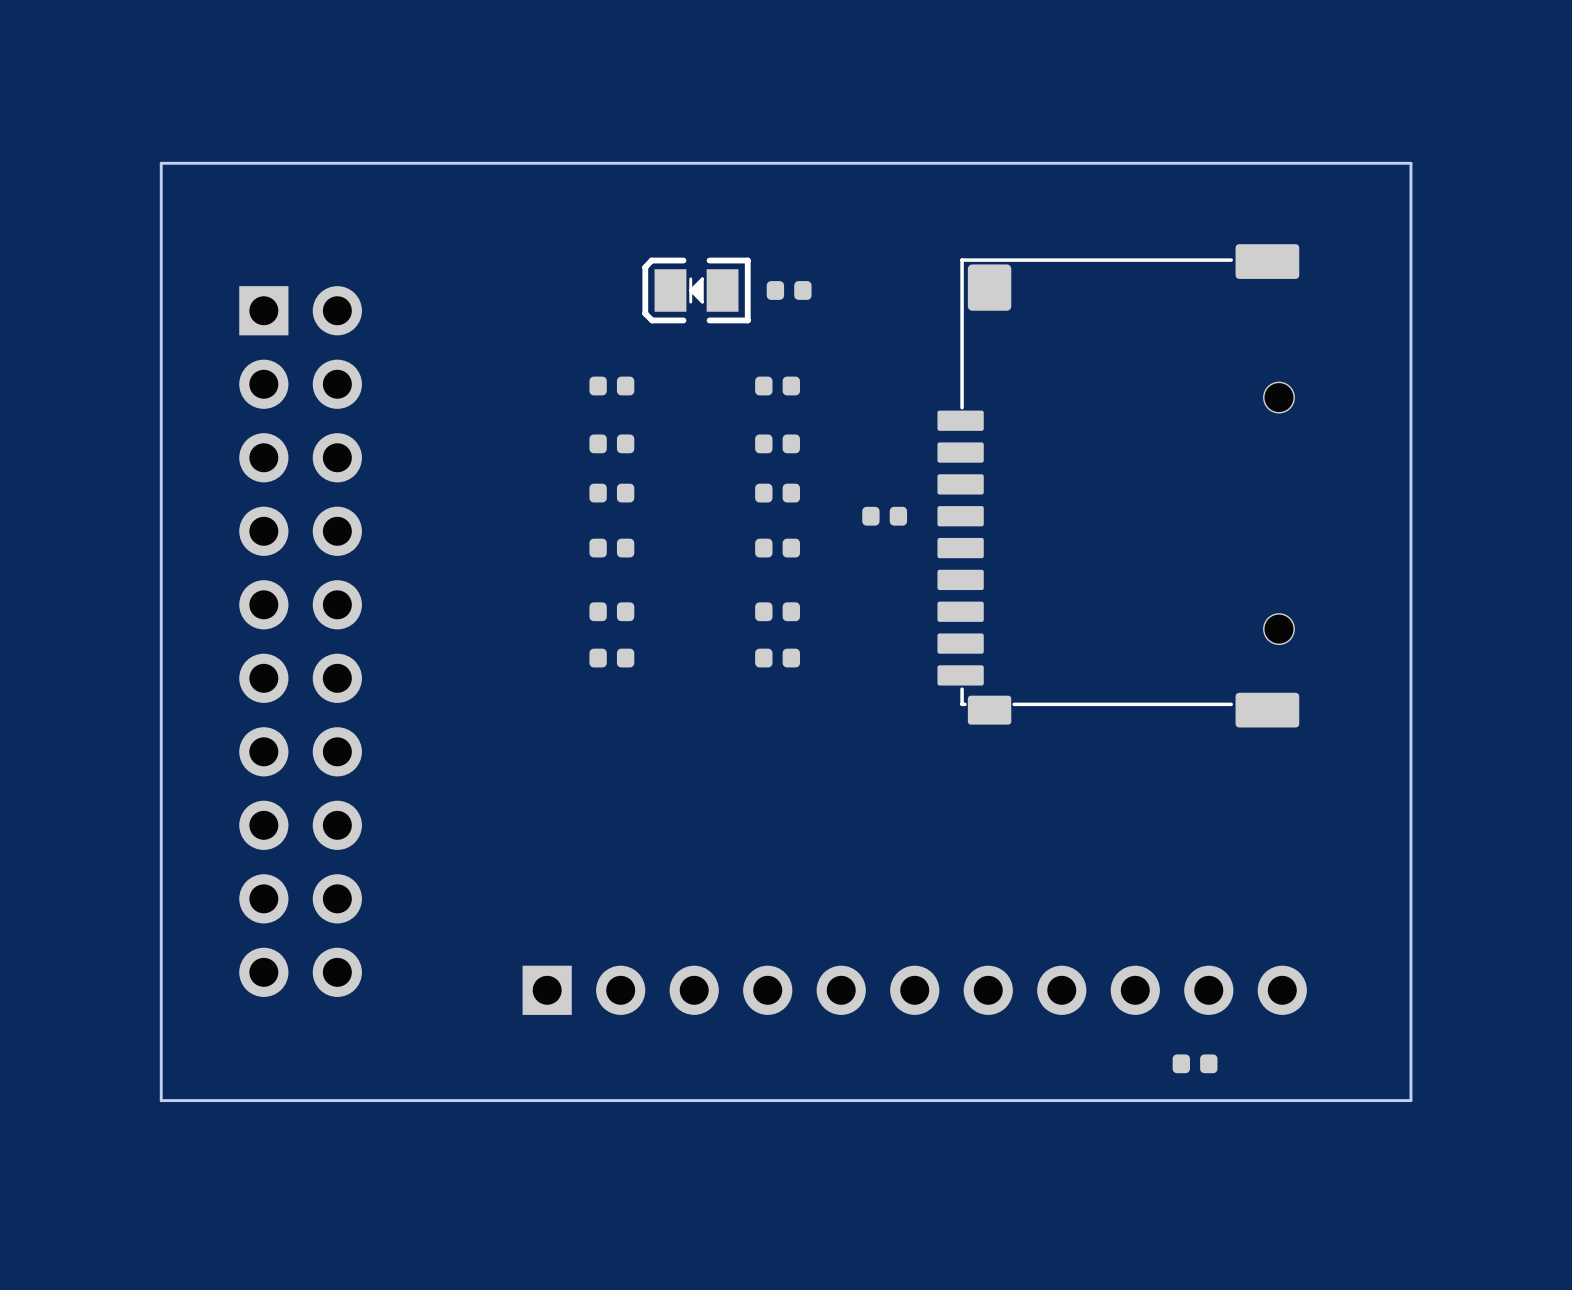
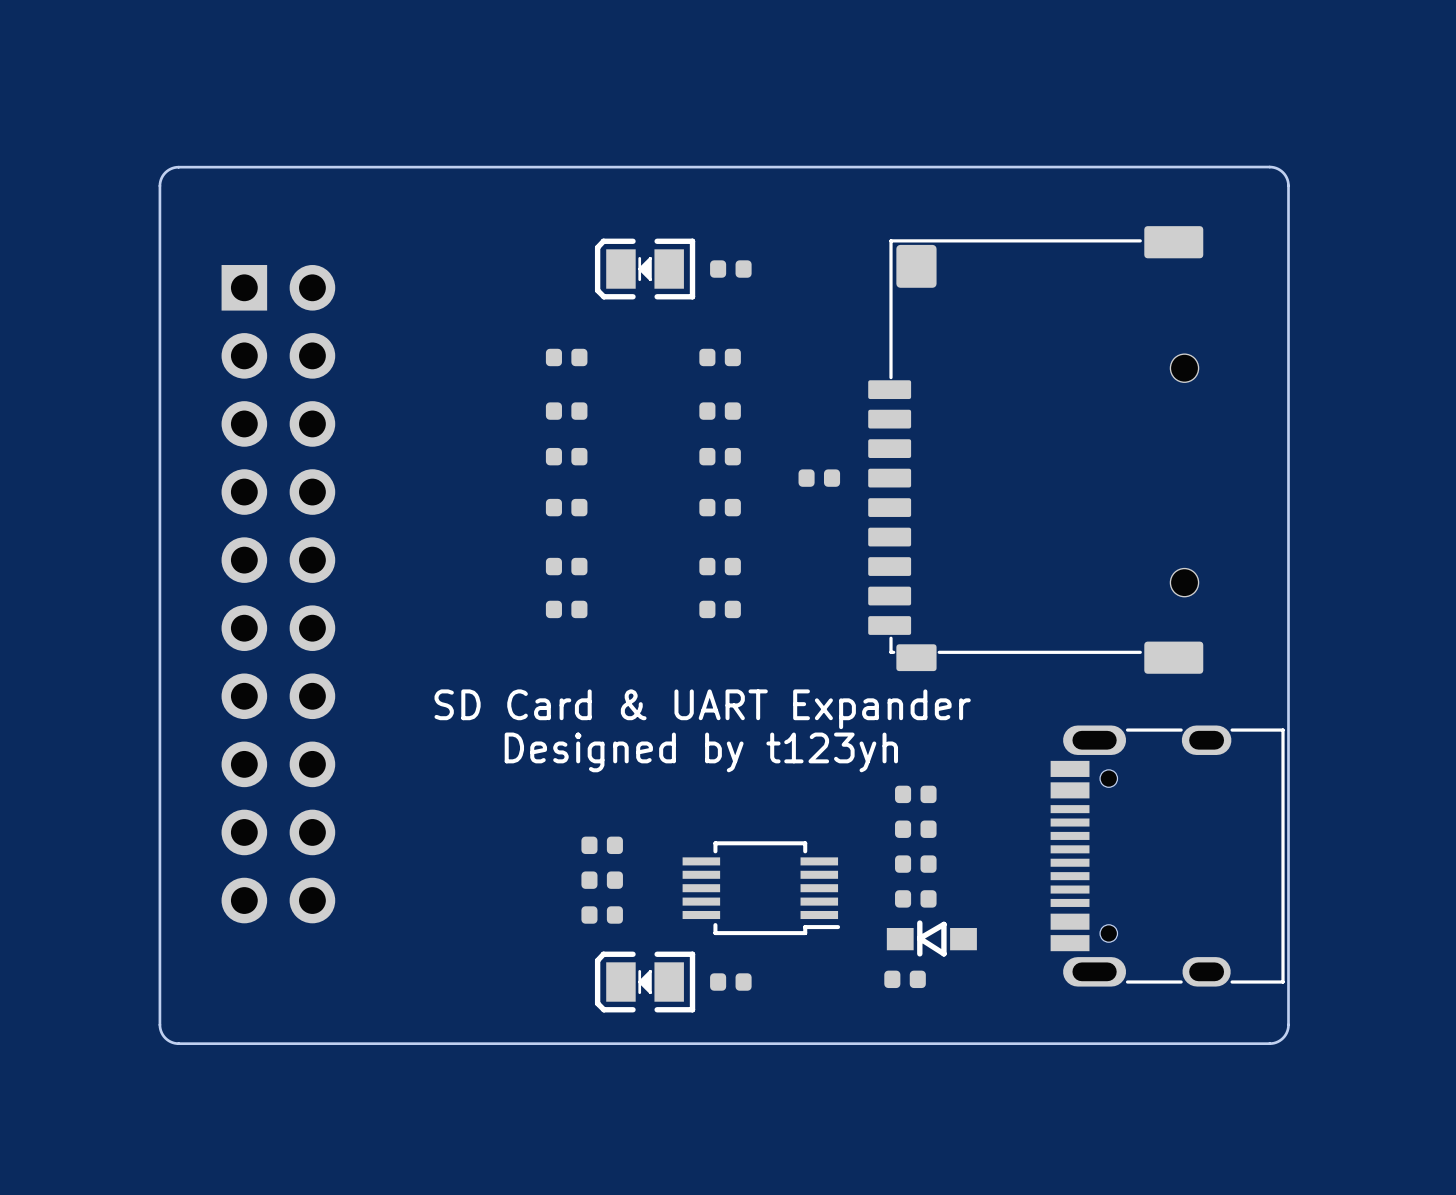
board edge: (161, 163) (1410, 163) (1410, 1100) (161, 1100) (161, 163) -> (1269, 167) (178, 167) (166, 171) (161, 177) (159, 185) (159, 1024) (164, 1036) (170, 1041) (178, 1043) (1269, 1043) (1281, 1039) (1286, 1033) (1288, 1024) (1288, 185) (1283, 172) (1269, 167)
text: none -> SD Card & UART Expander (702, 709)
text: none -> Designed by t123yh (701, 752)
part: none -> (915, 794)
part: none -> (915, 829)
part: none -> (602, 845)
part: none -> (1167, 856)
part: none -> (915, 864)
part: none -> (602, 880)
part: none -> (761, 888)
part: none -> (915, 898)
part: none -> (602, 915)
part: (914, 990) -> none
part: none -> (931, 938)
part: none -> (905, 979)
part: none -> (645, 982)
part: none -> (730, 982)
part: (1195, 1063) -> none

